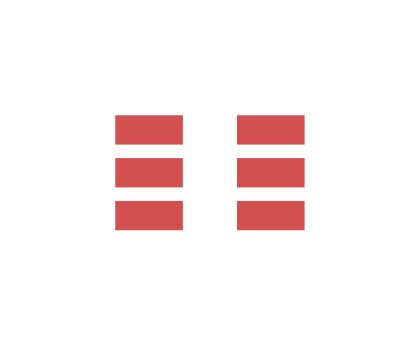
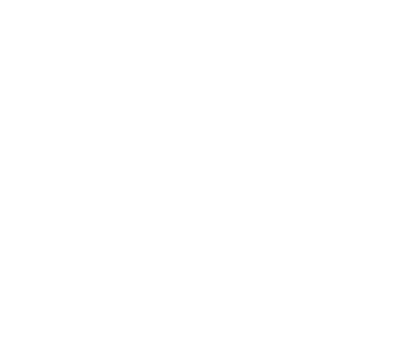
part: (209, 172) -> none

